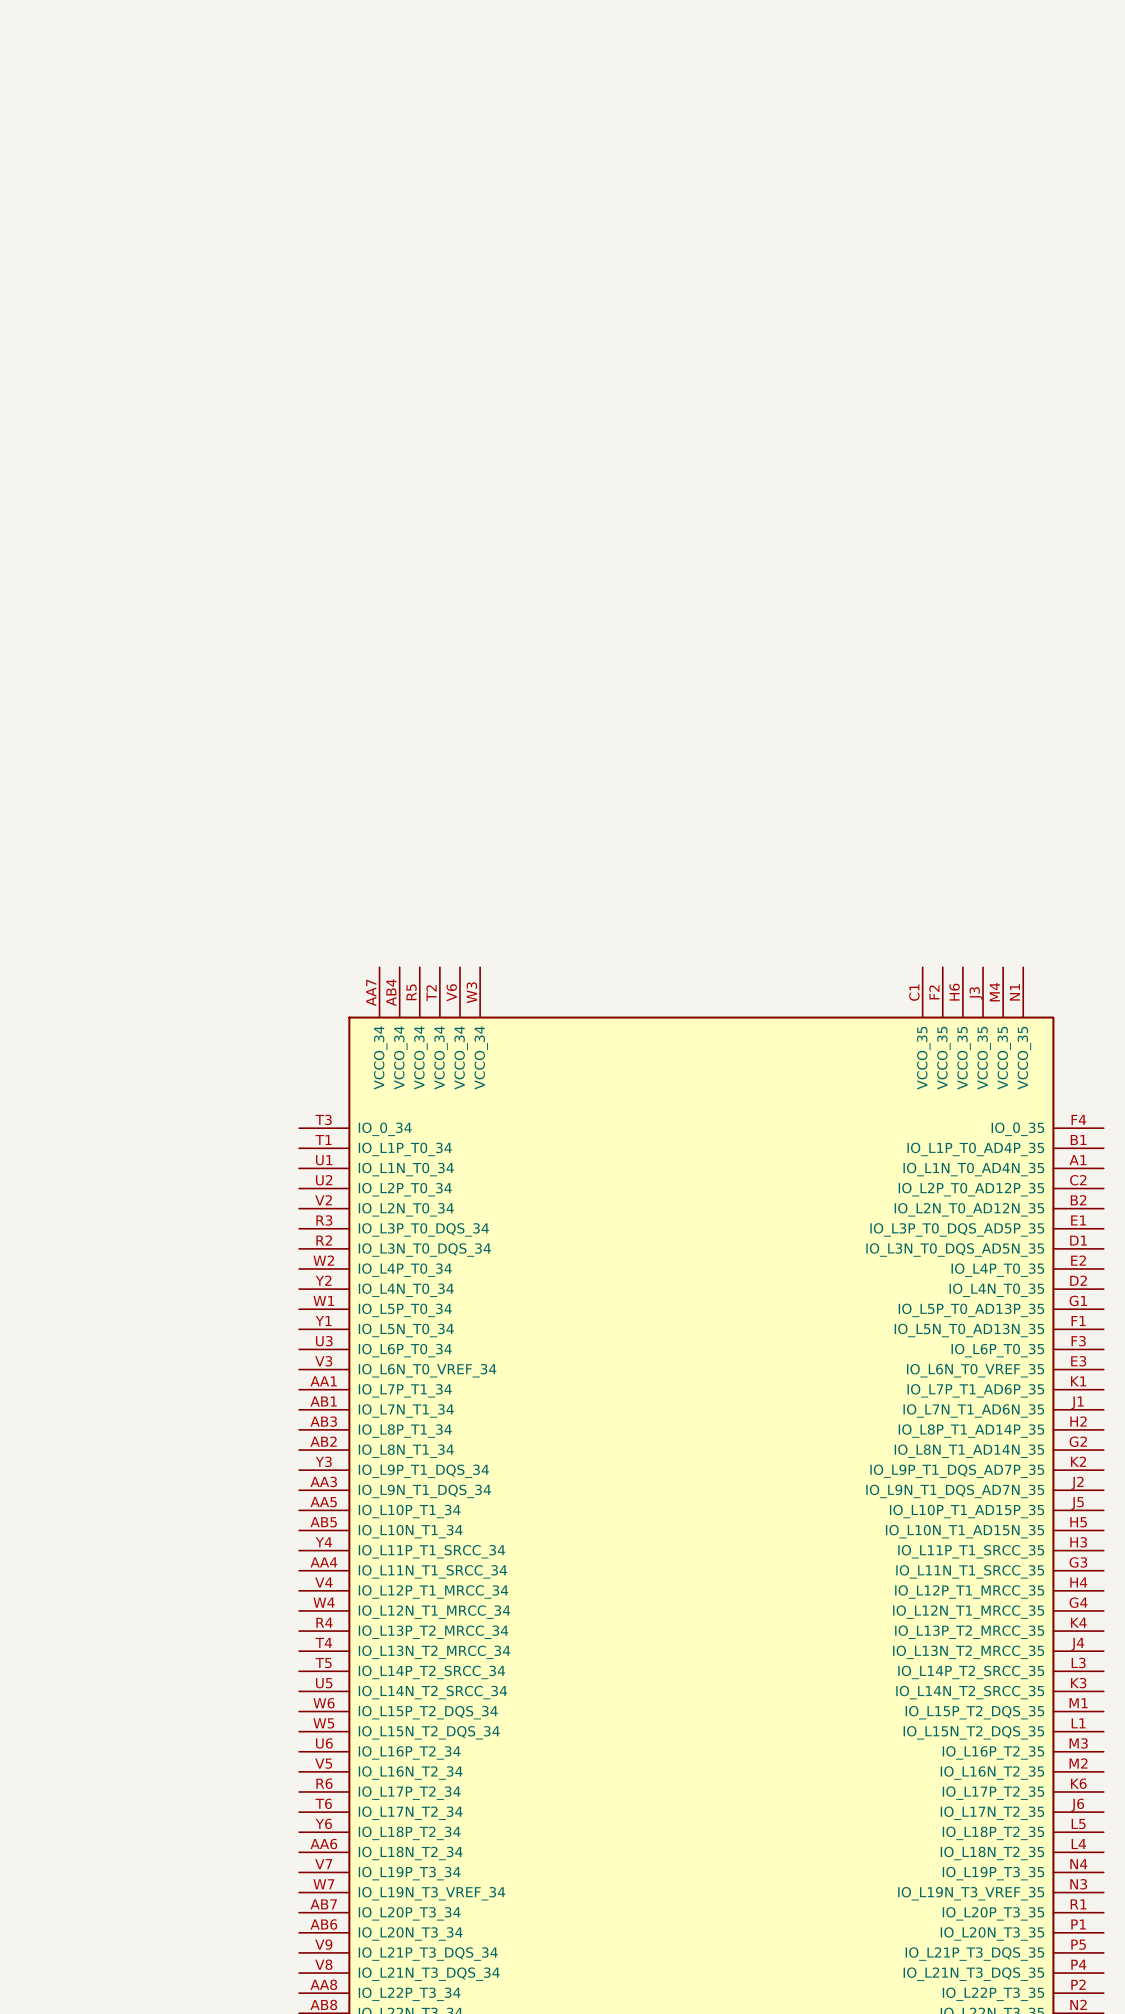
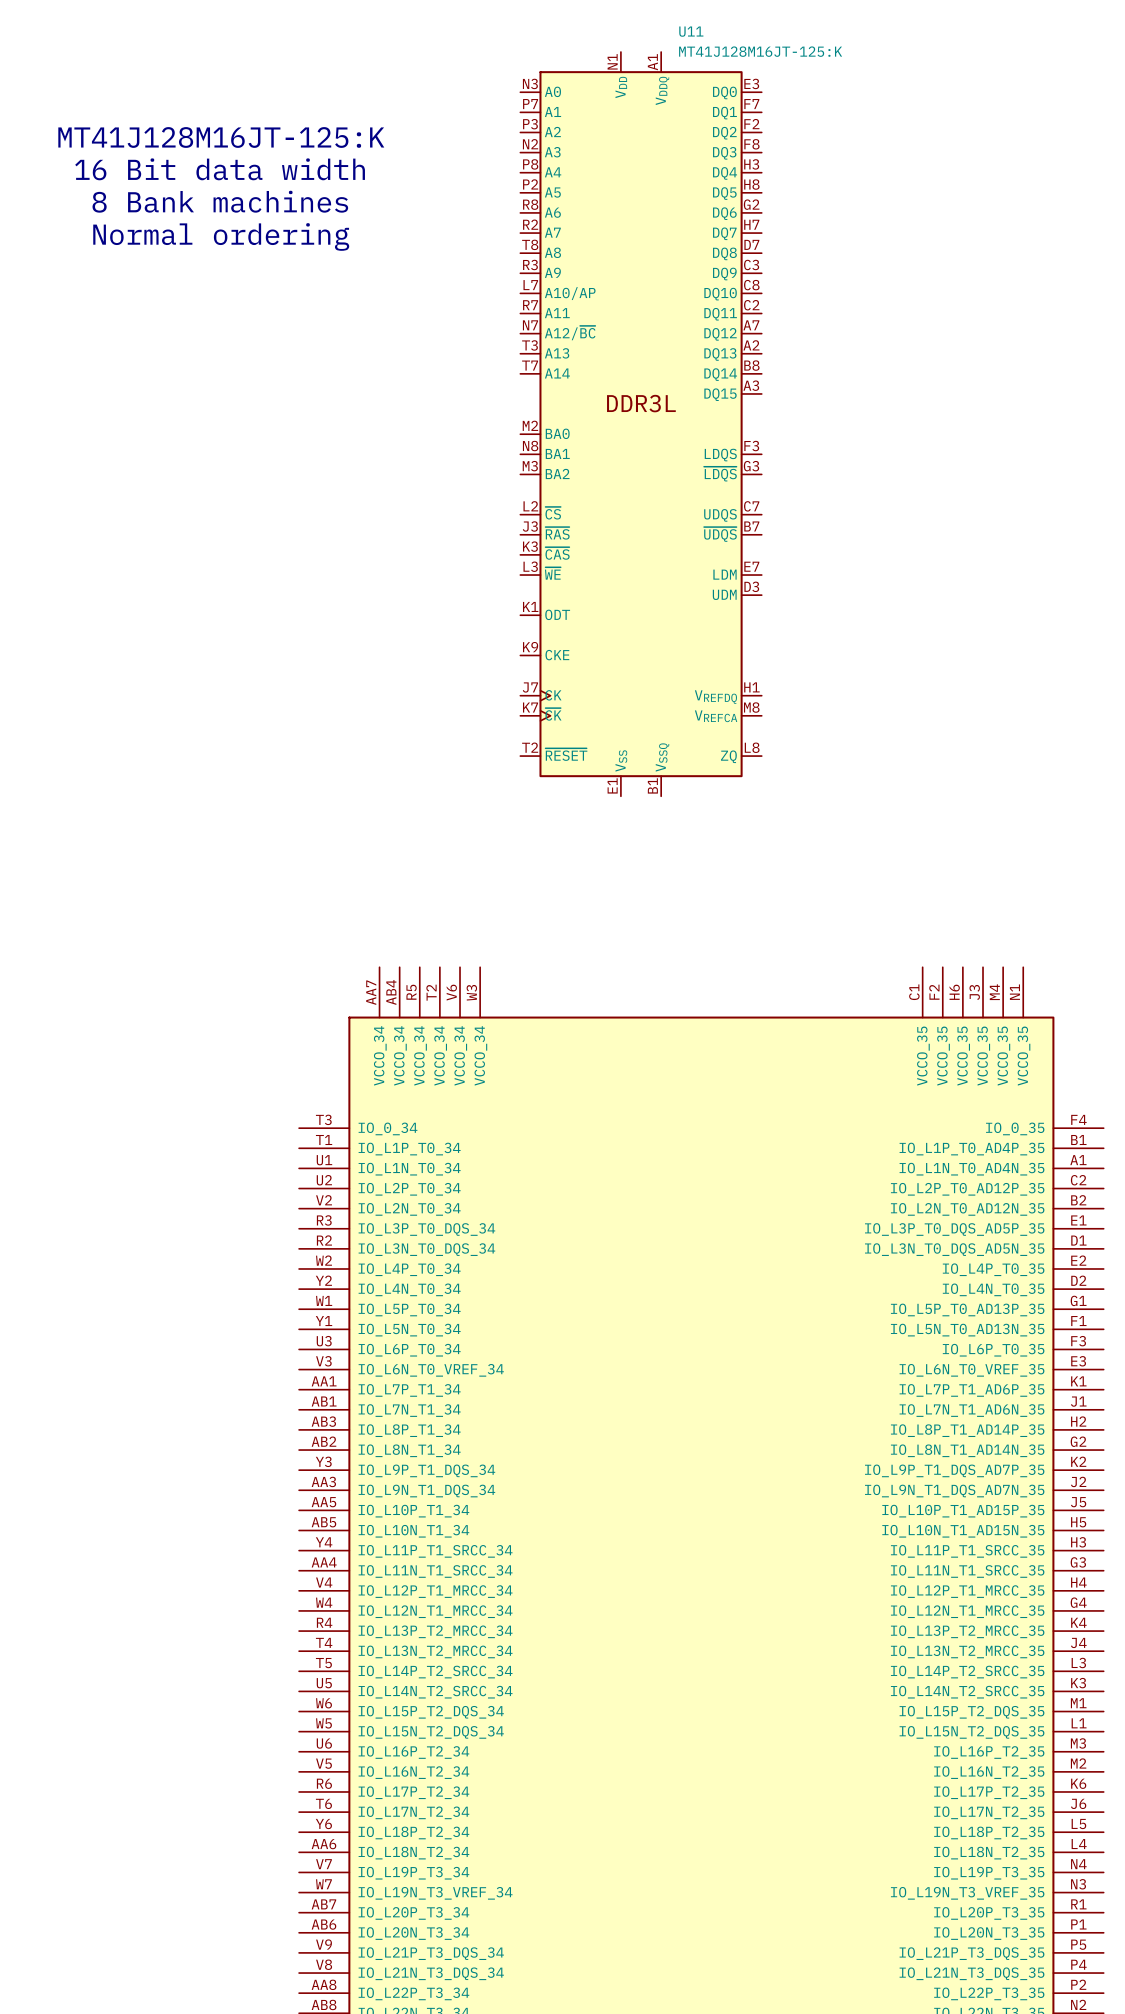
text: none -> MT41J128M16JT-125:K (221, 137)
text: none -> 16 Bit data width (220, 169)
text: none -> 8 Bank machines (220, 201)
text: none -> Normal ordering (221, 236)
U11: none -> MT41J128M16JT-125:K (641, 424)

